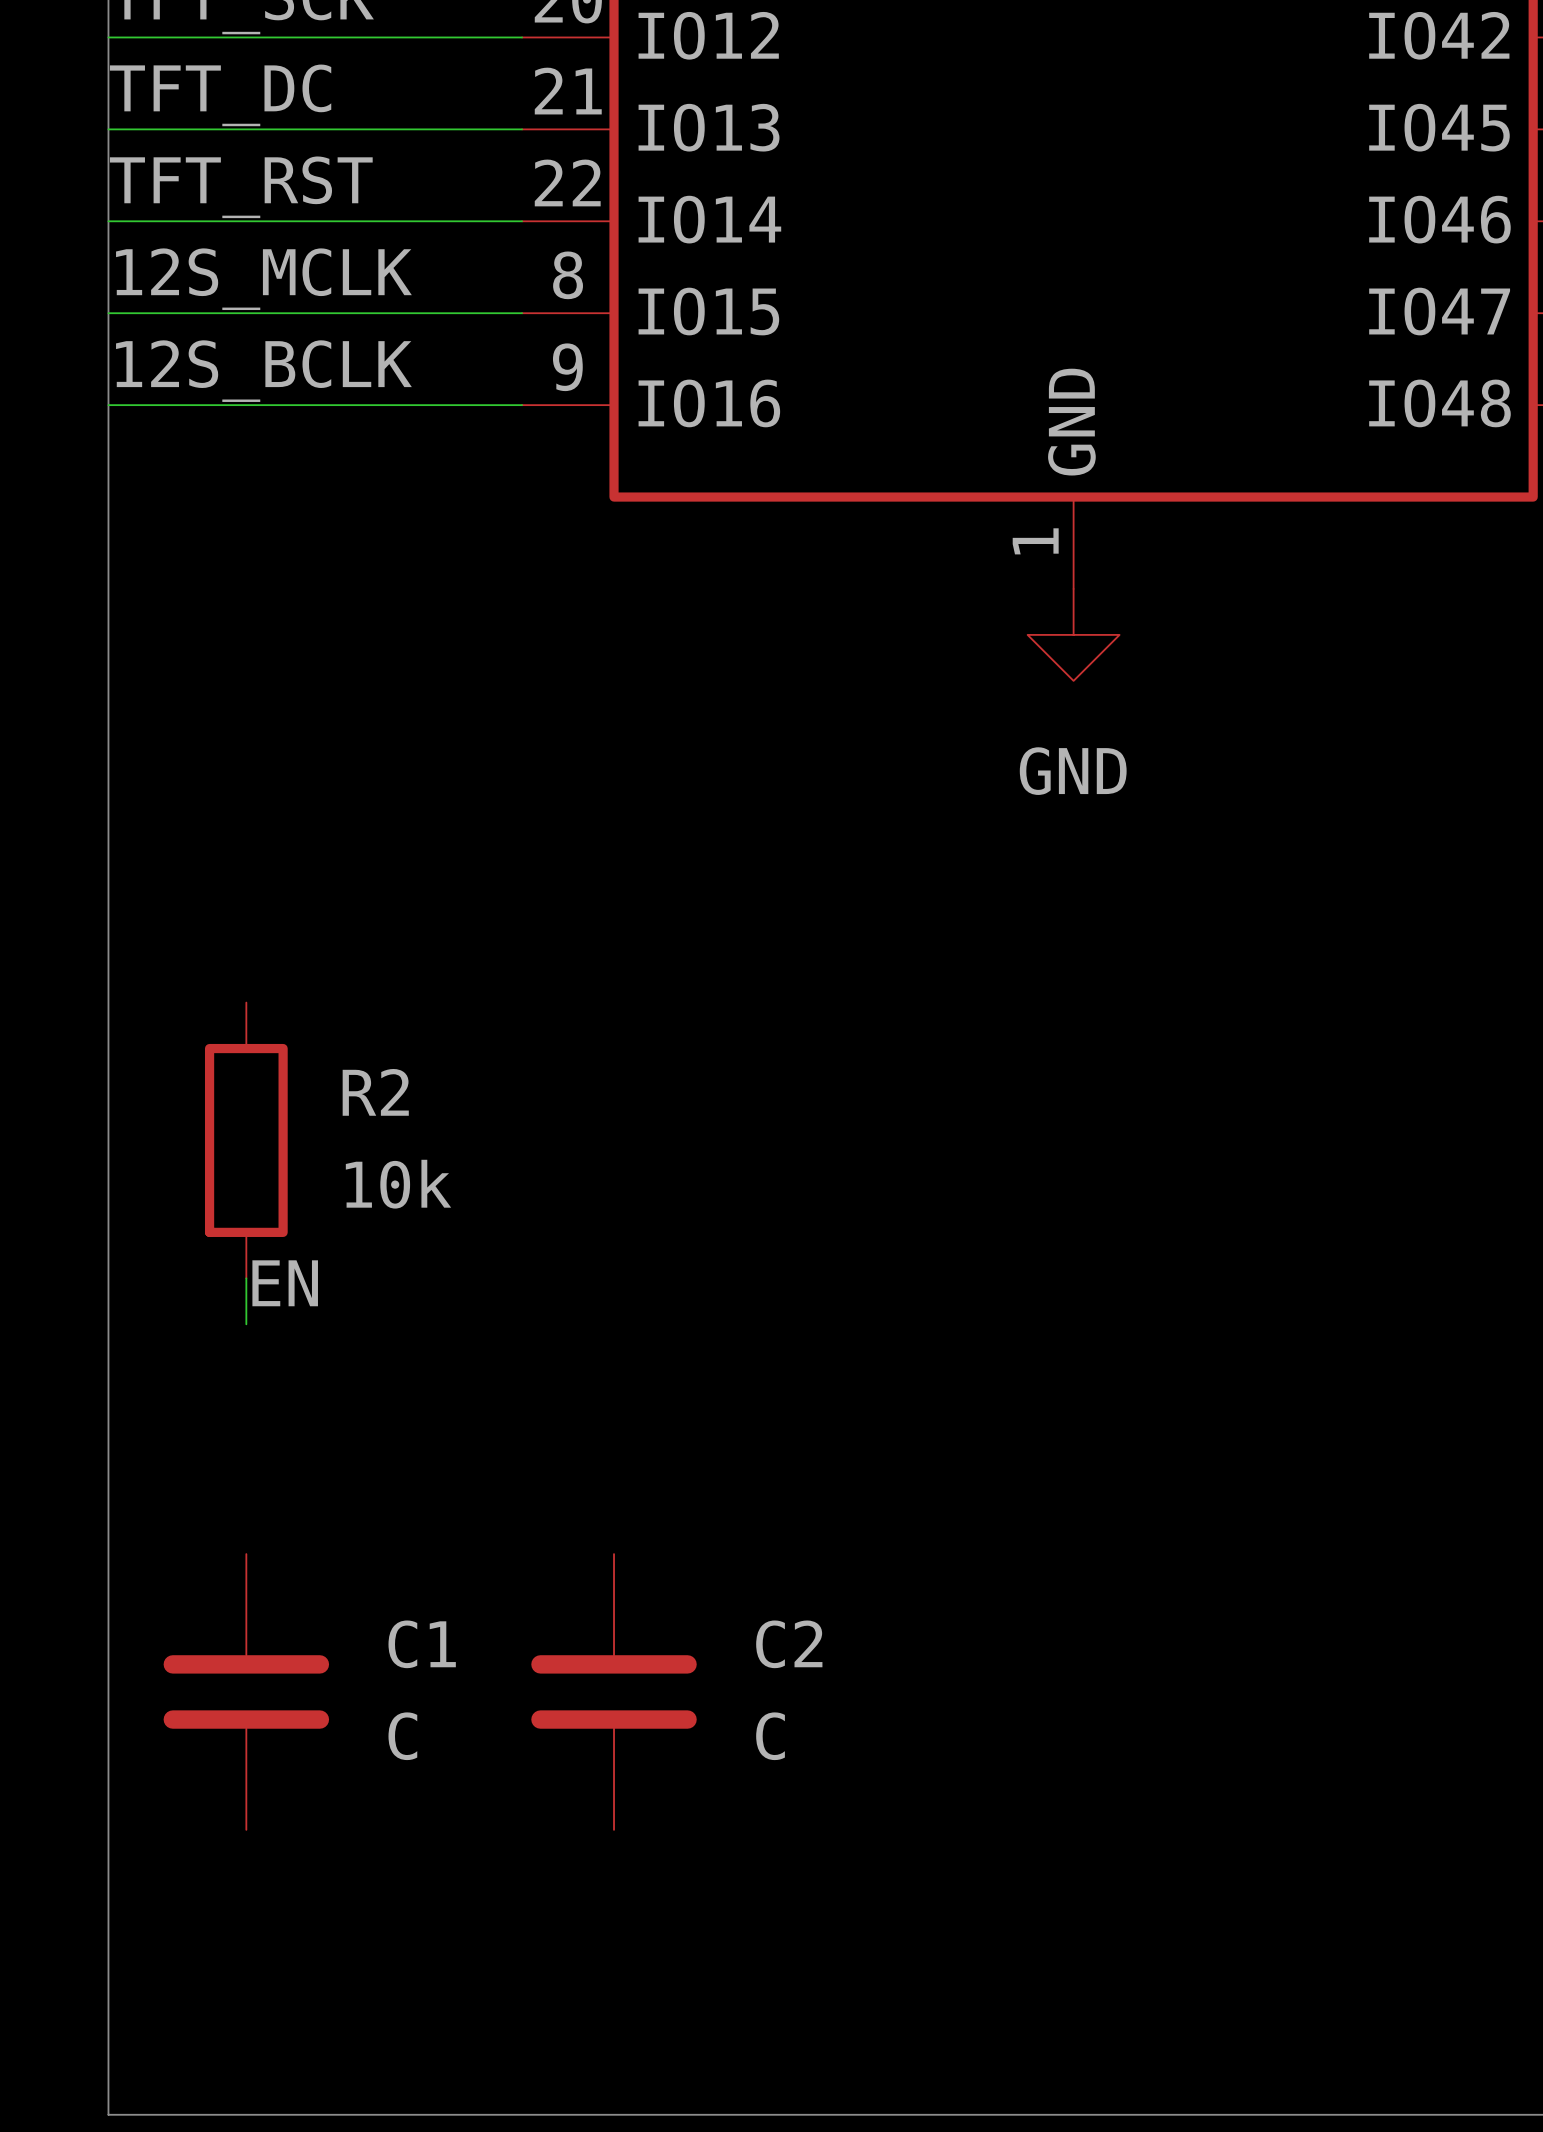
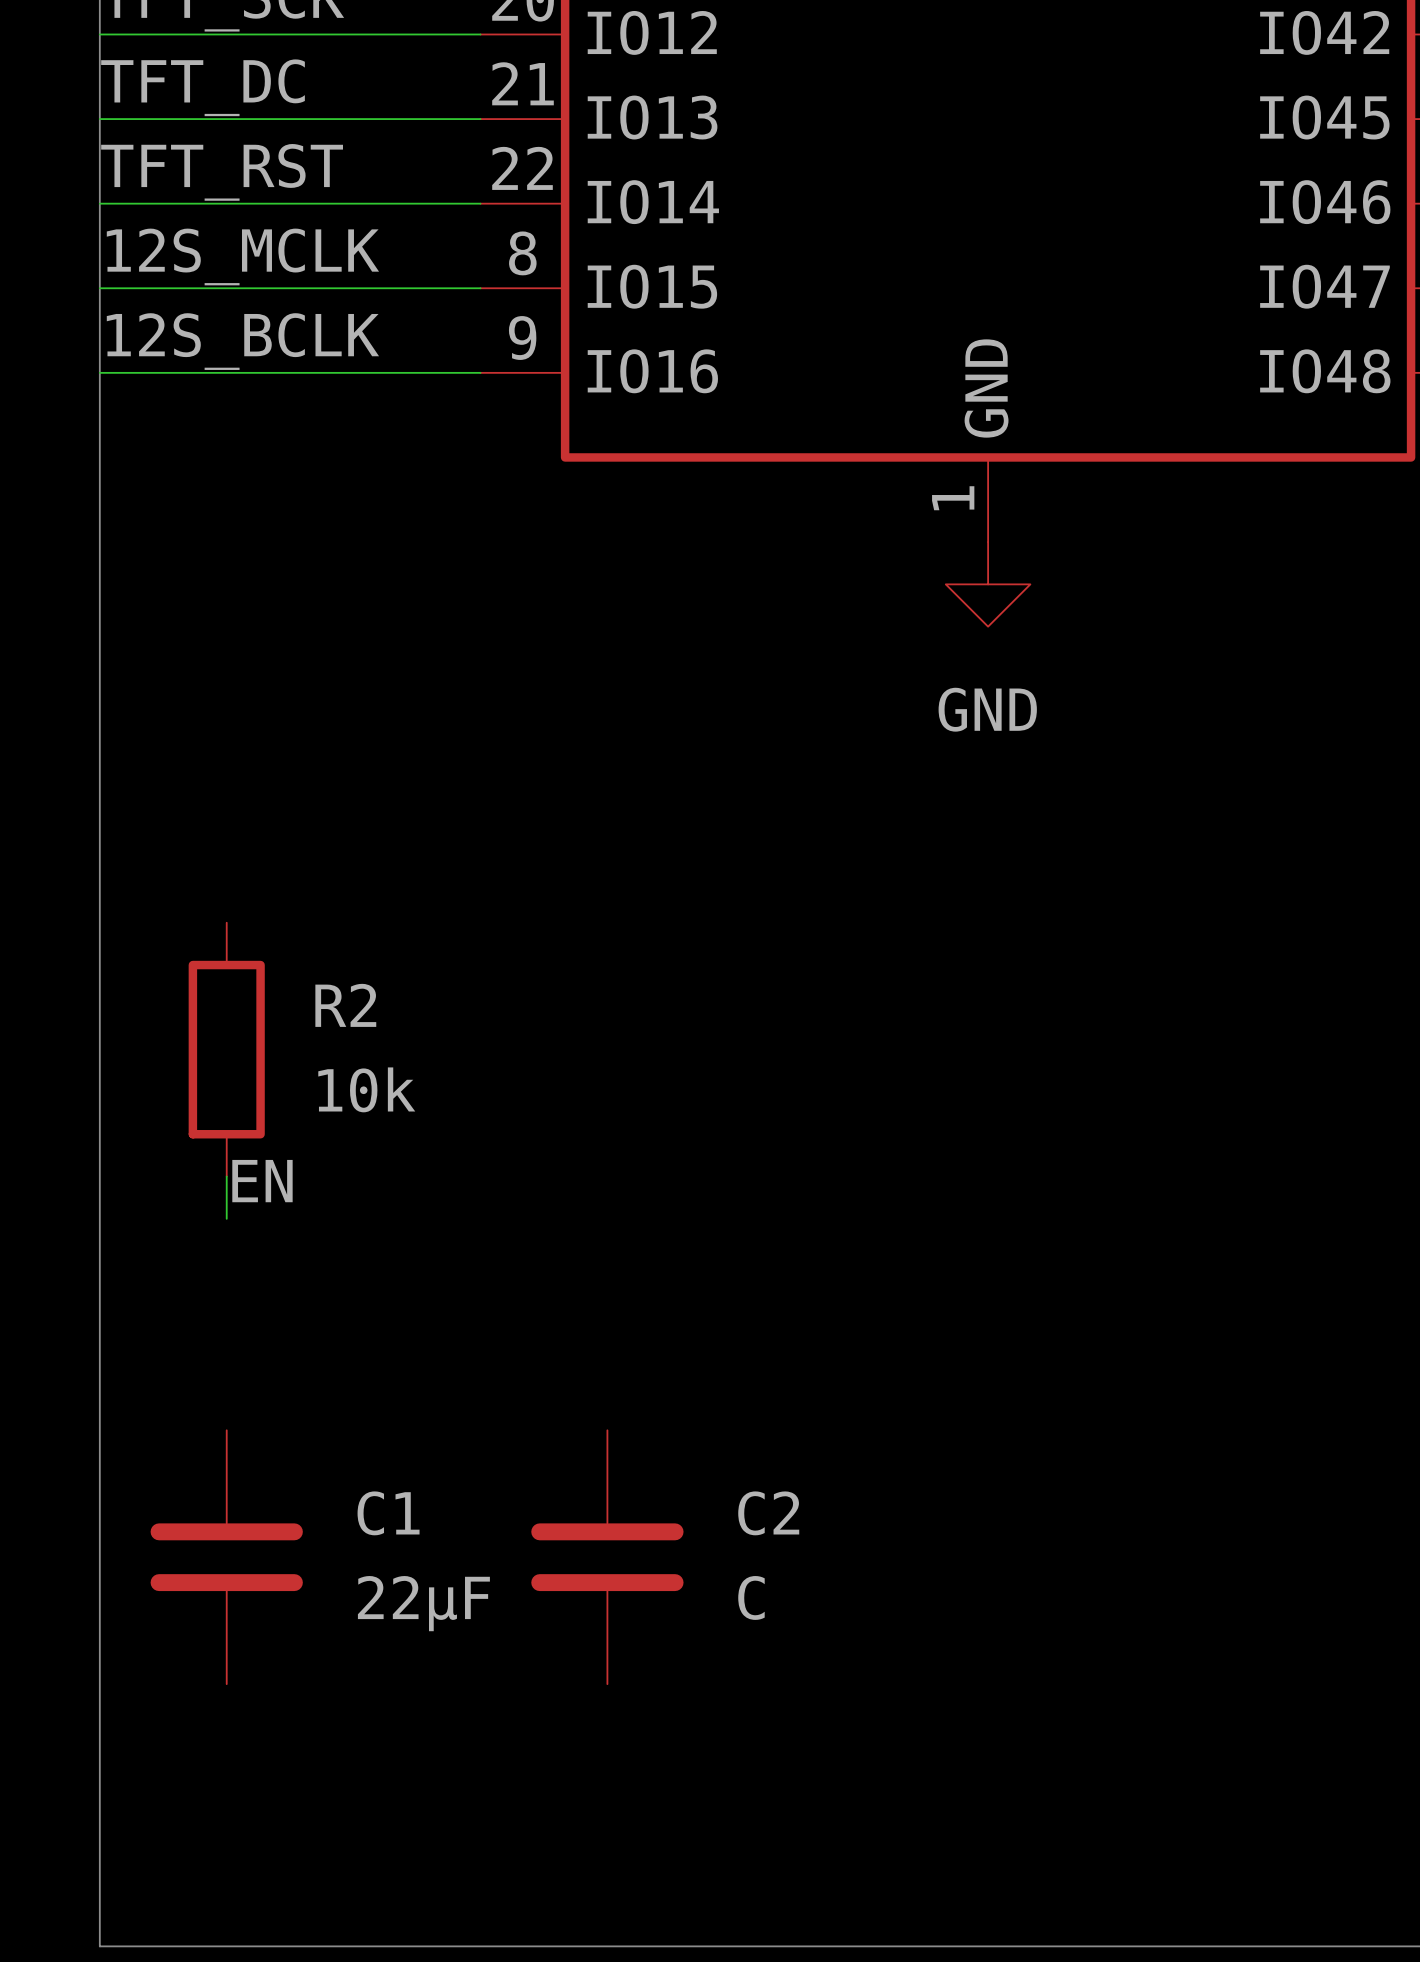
C2 position: (614, 1691) -> (607, 1557)
C1 value: C (402, 1736) -> 22μF (423, 1603)

